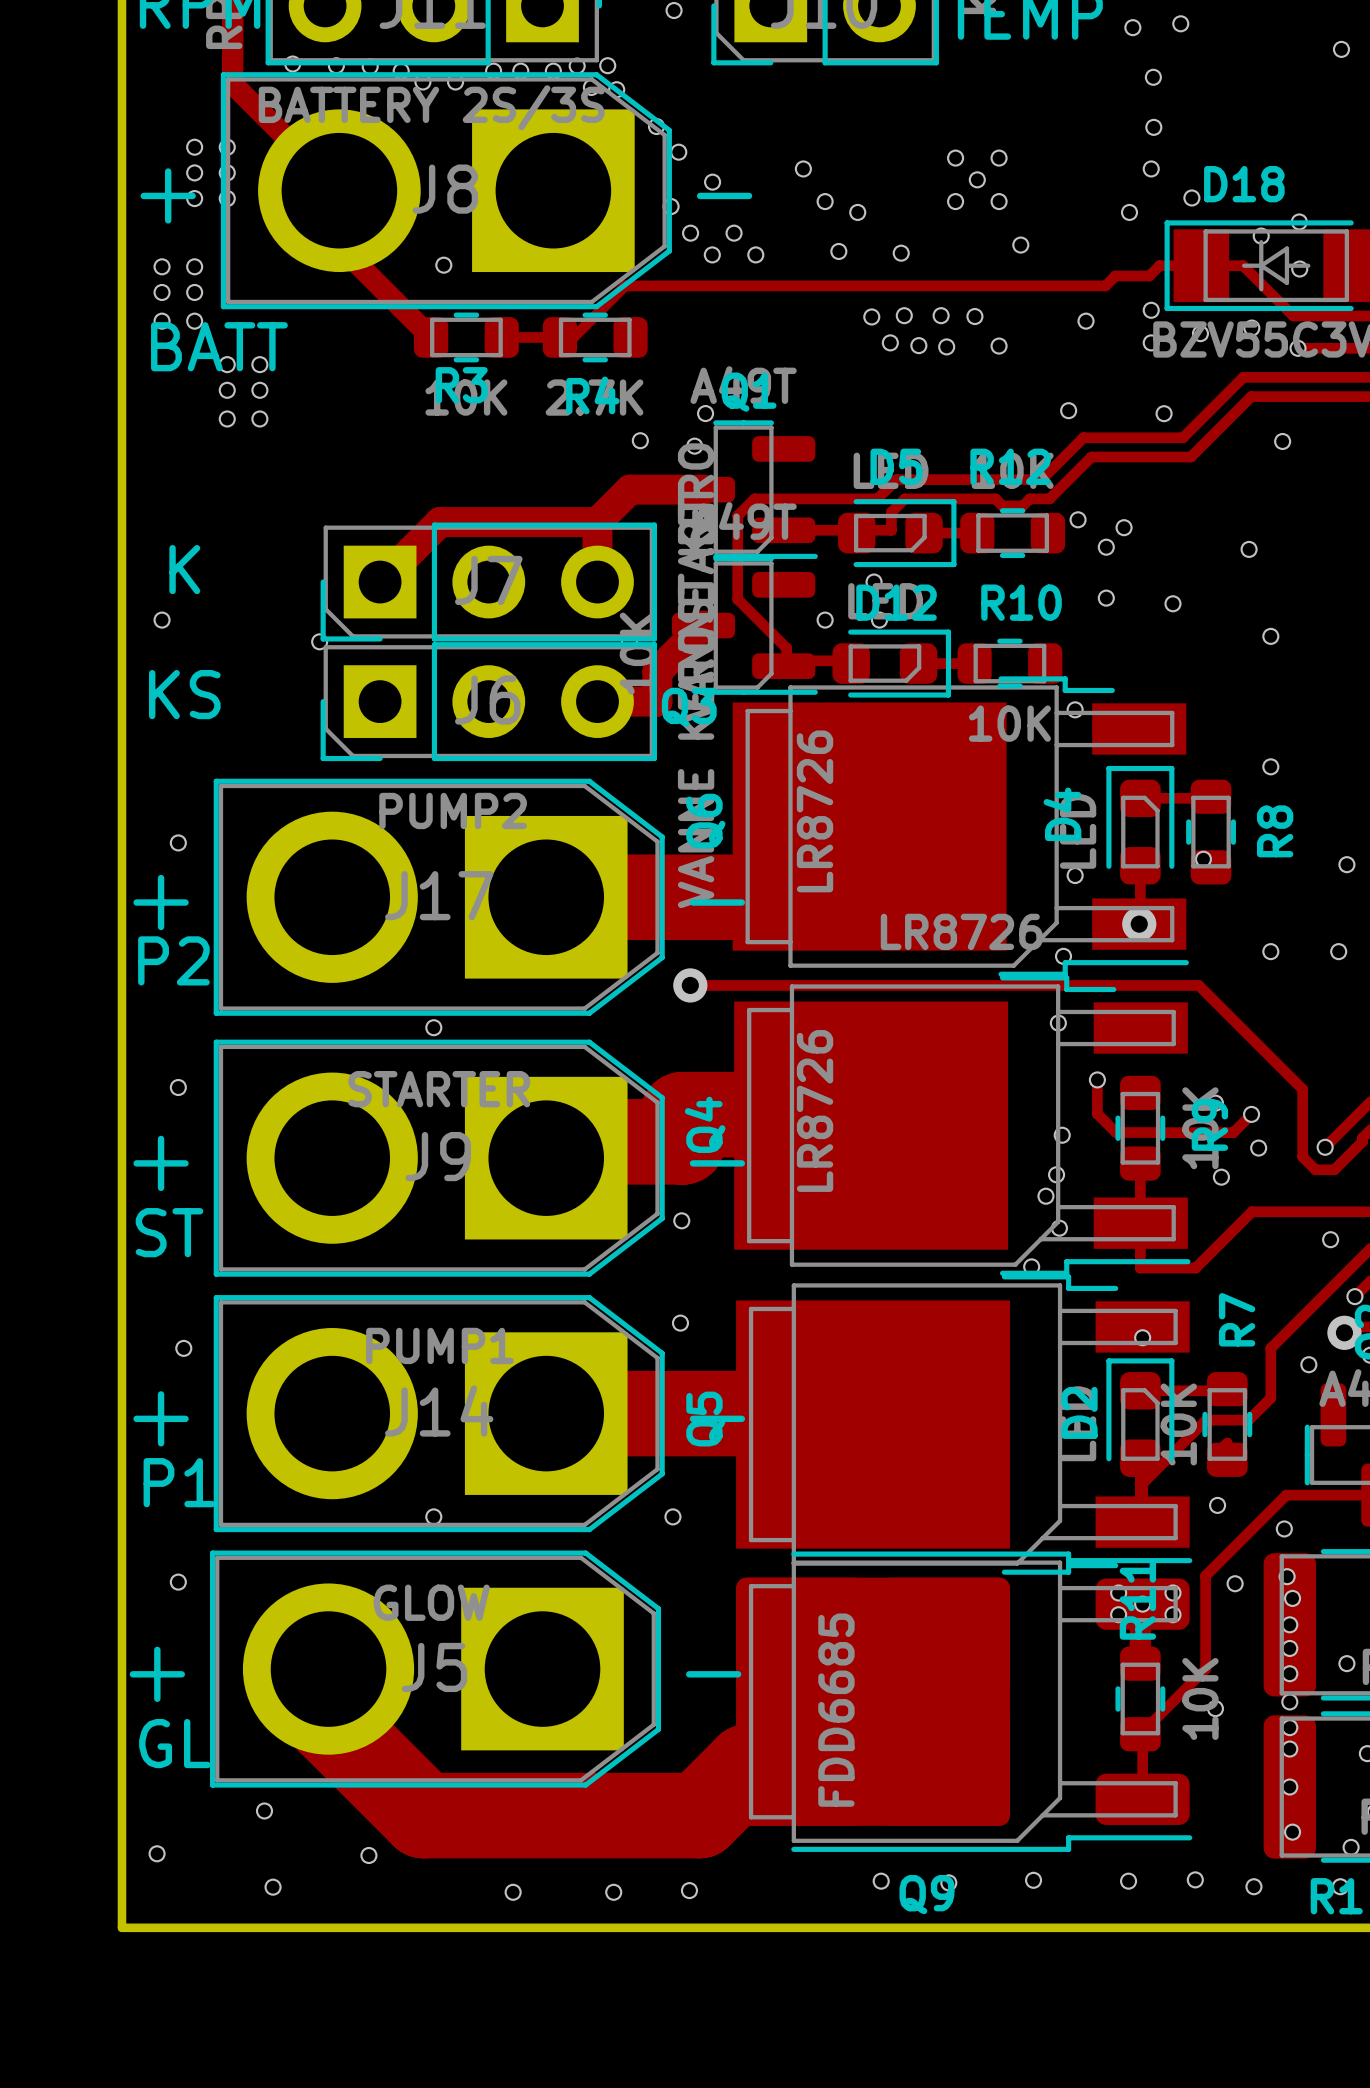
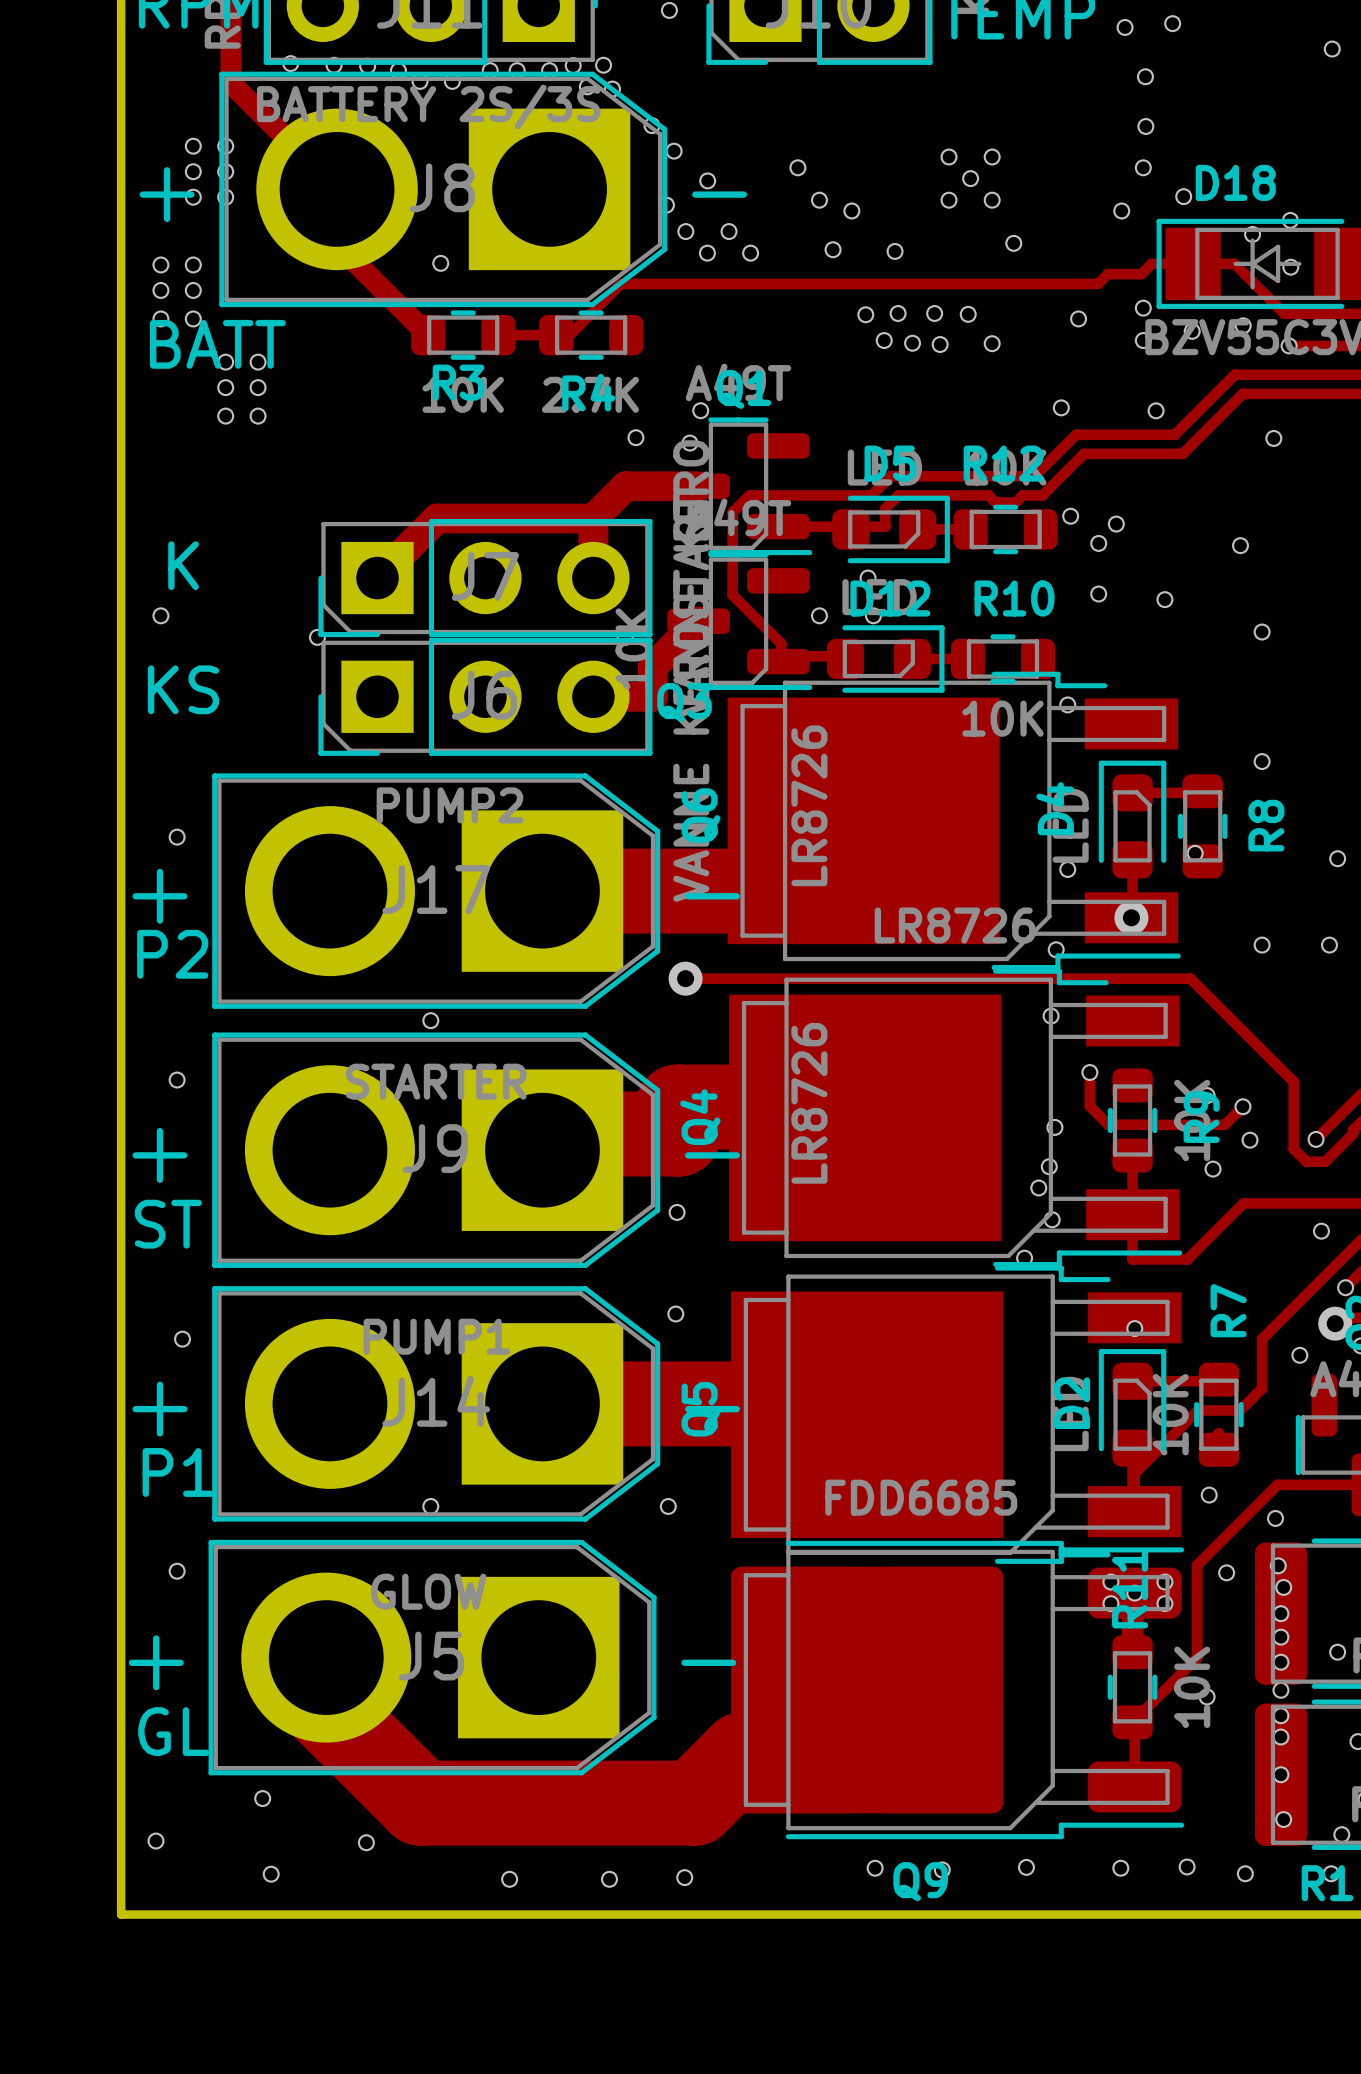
Q9 value rotation: 0° (836, 1710) -> 90° clockwise (921, 1497)

